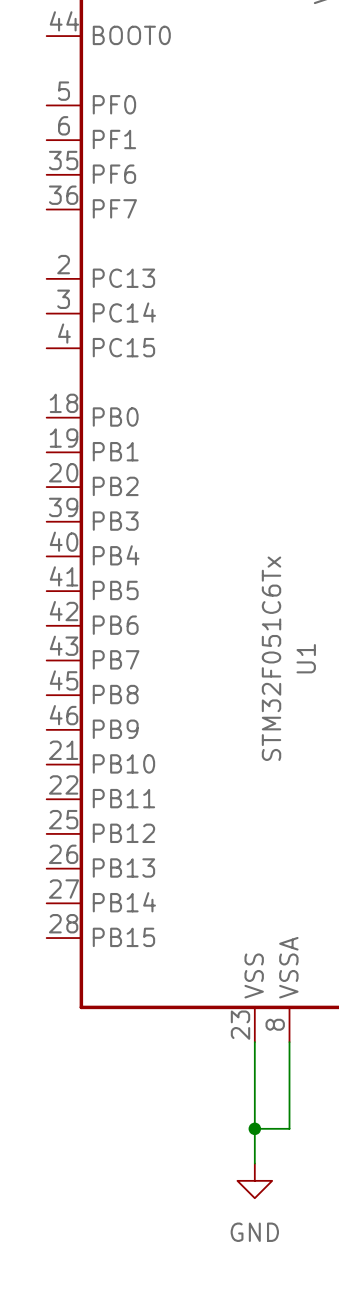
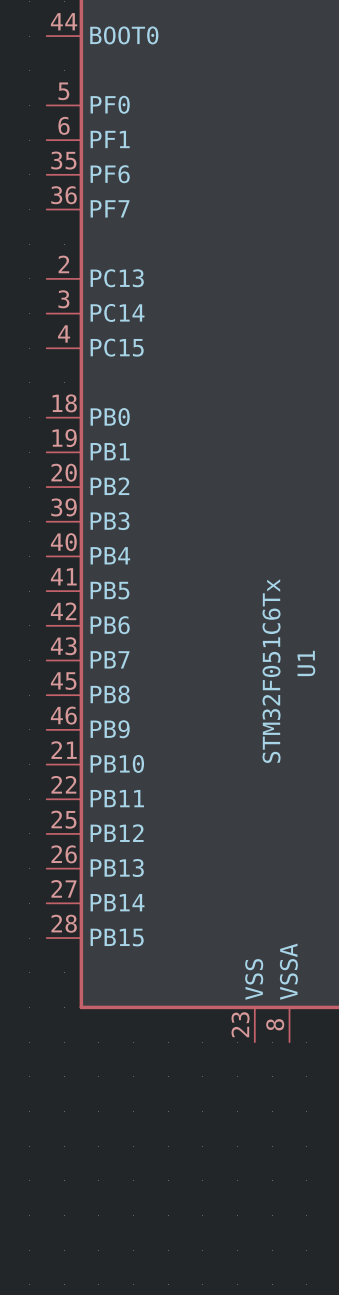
wire: (254, 1042) (254, 1163) -> none
wire: (289, 1042) (289, 1128) (254, 1128) -> none
junction: (254, 1128) -> none
power symbol: GND (254, 1180) -> none

